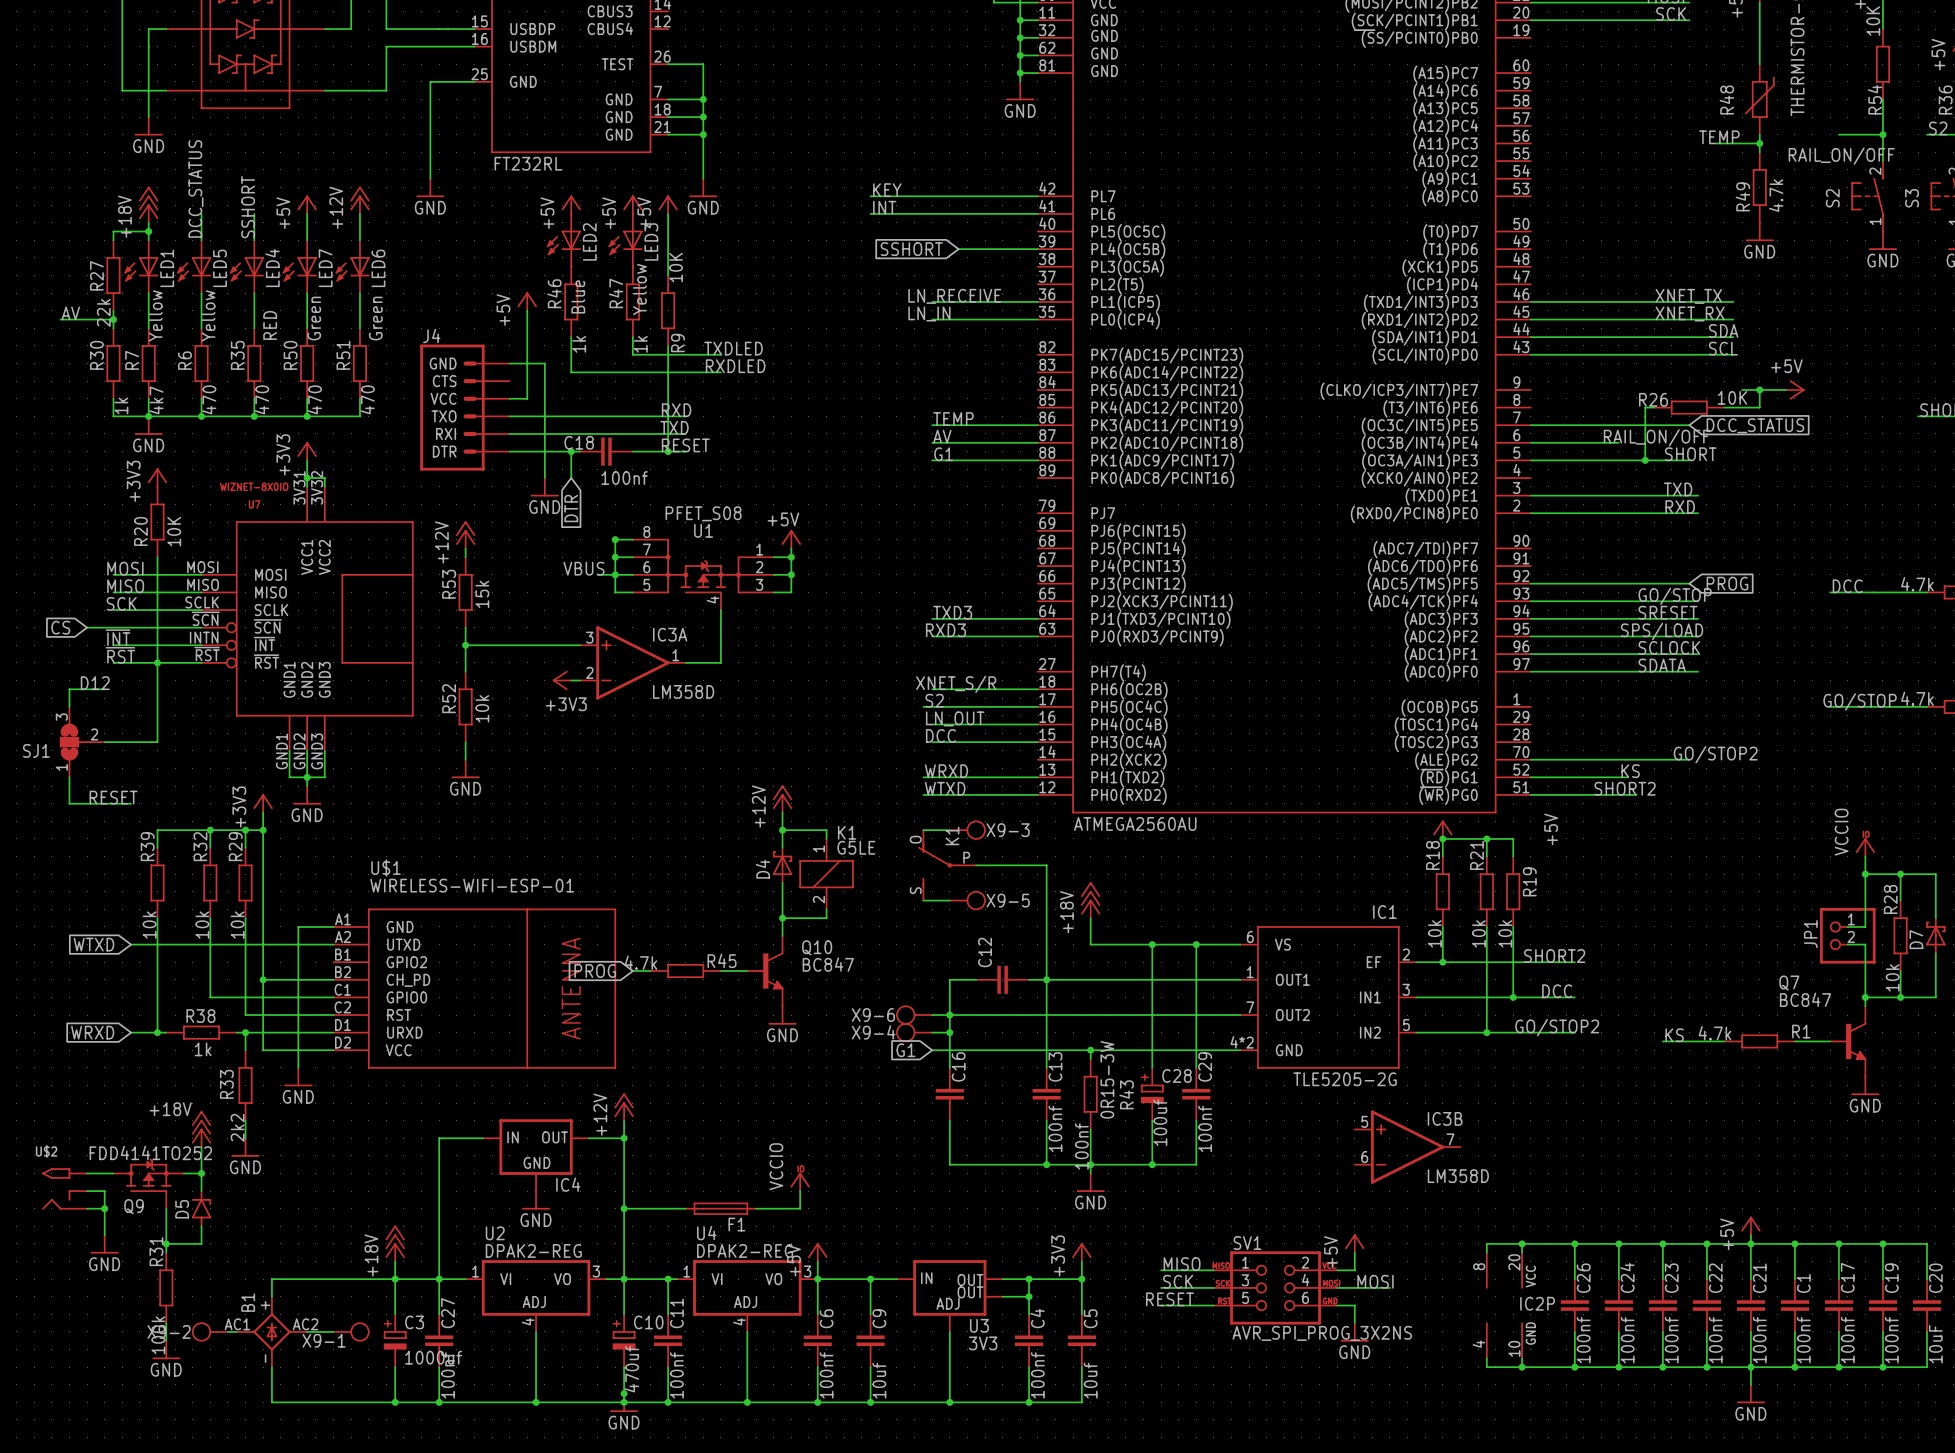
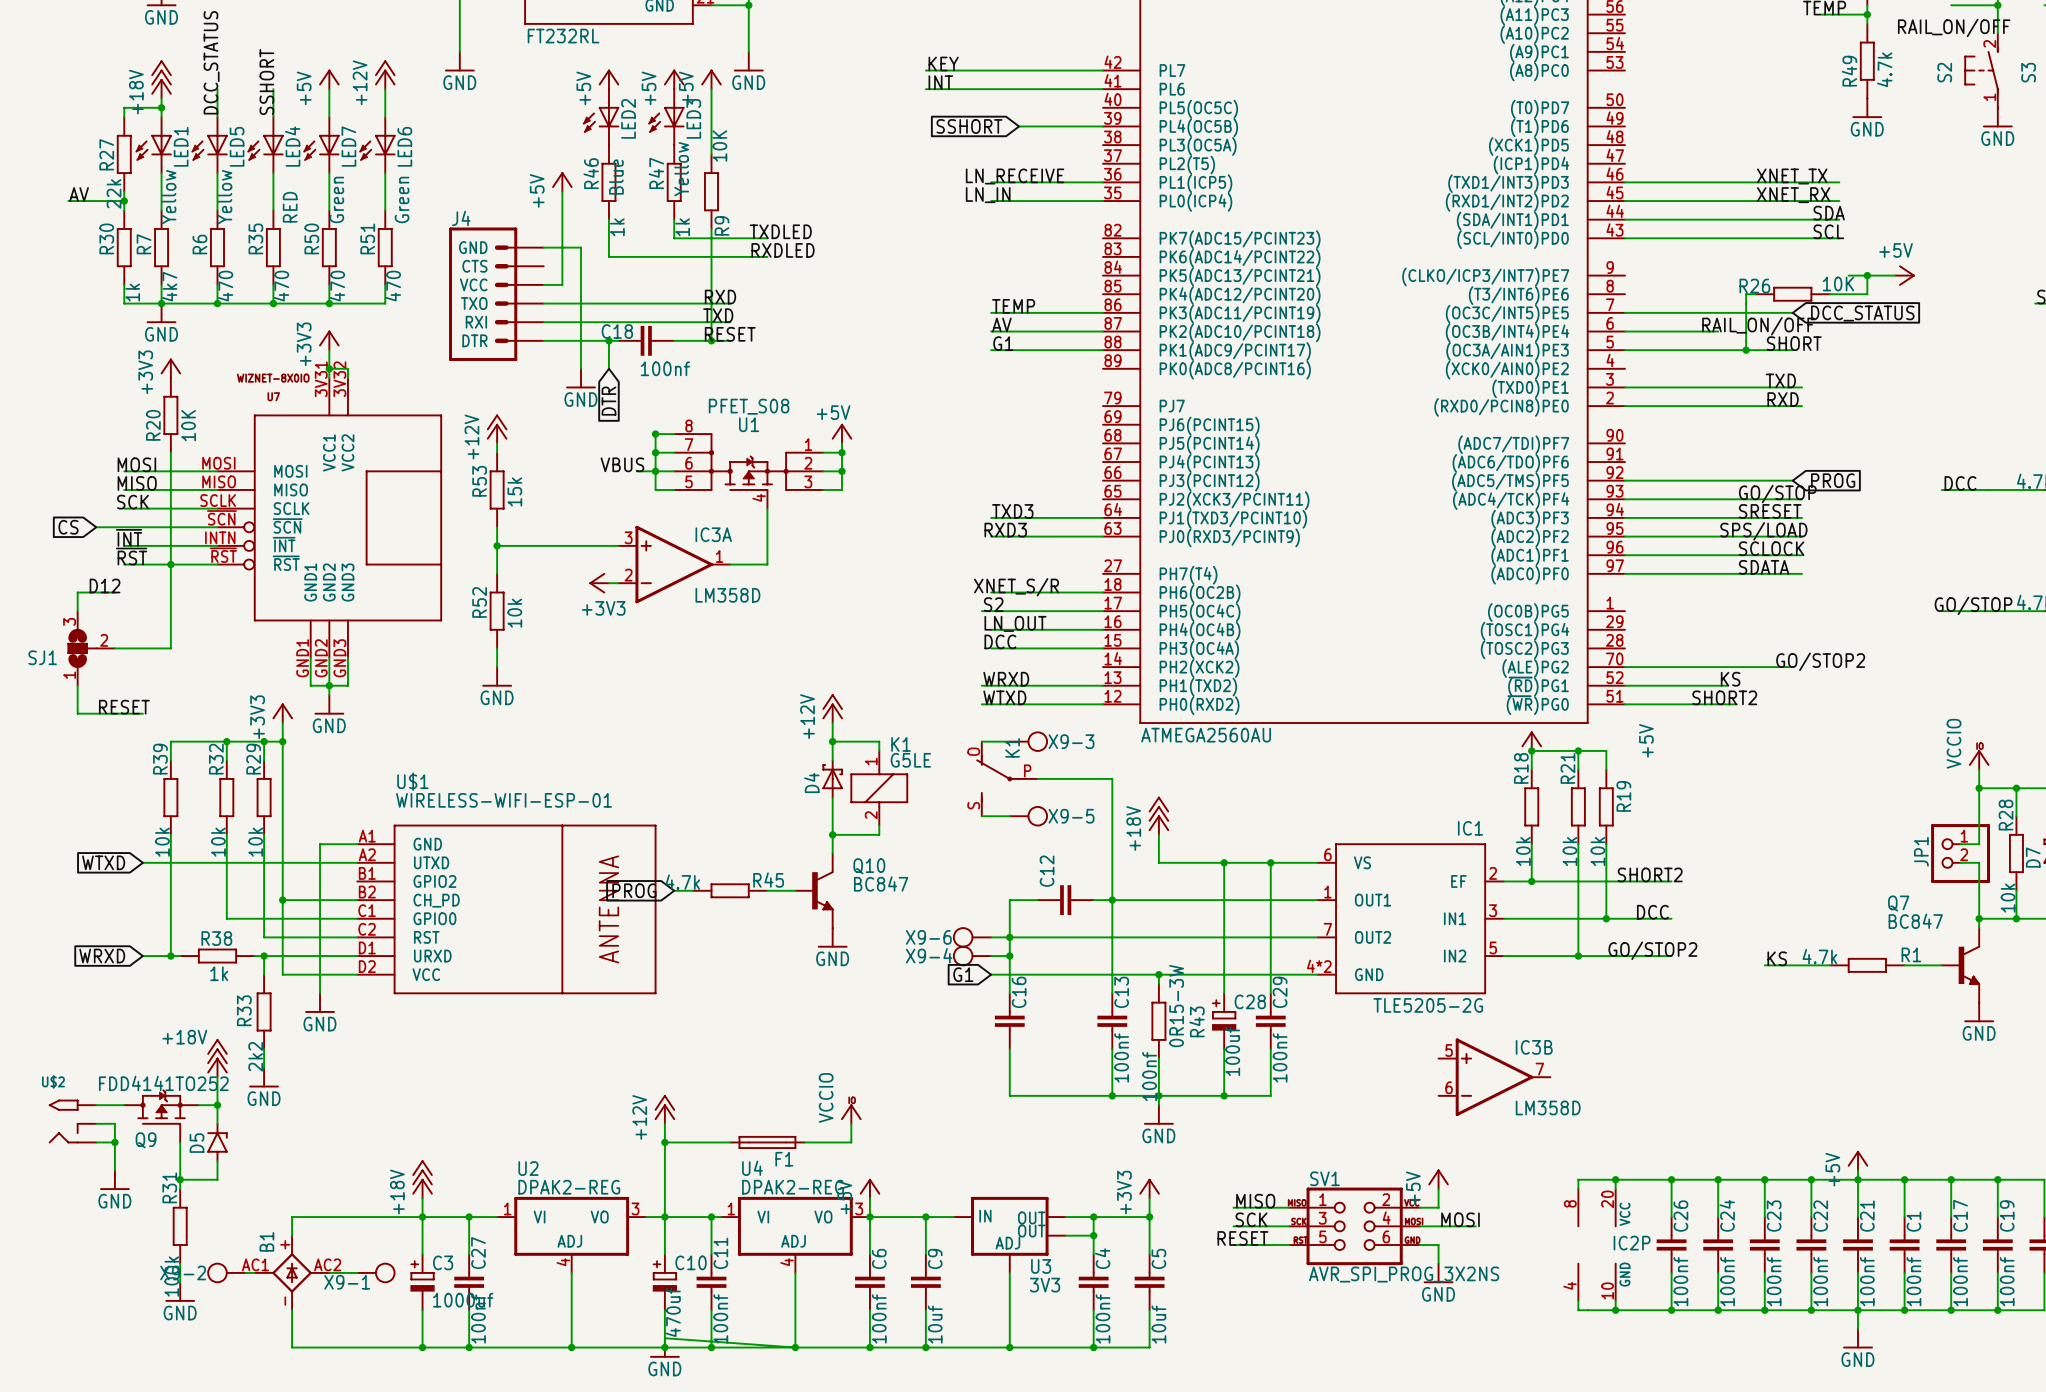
power symbol position: +12V (624, 1107) -> +12V (664, 1109)
wire: (624, 1120) (624, 1191) -> none
wire: (483, 1138) (439, 1138) (439, 1279) -> none
wire: (588, 1138) (624, 1138) -> none
junction: (624, 1138) -> none
IC4: (536, 1155) -> none
power symbol: GND (536, 1200) -> none
wire: none -> (664, 1338) (795, 1347)
junction: (624, 1393) -> none

